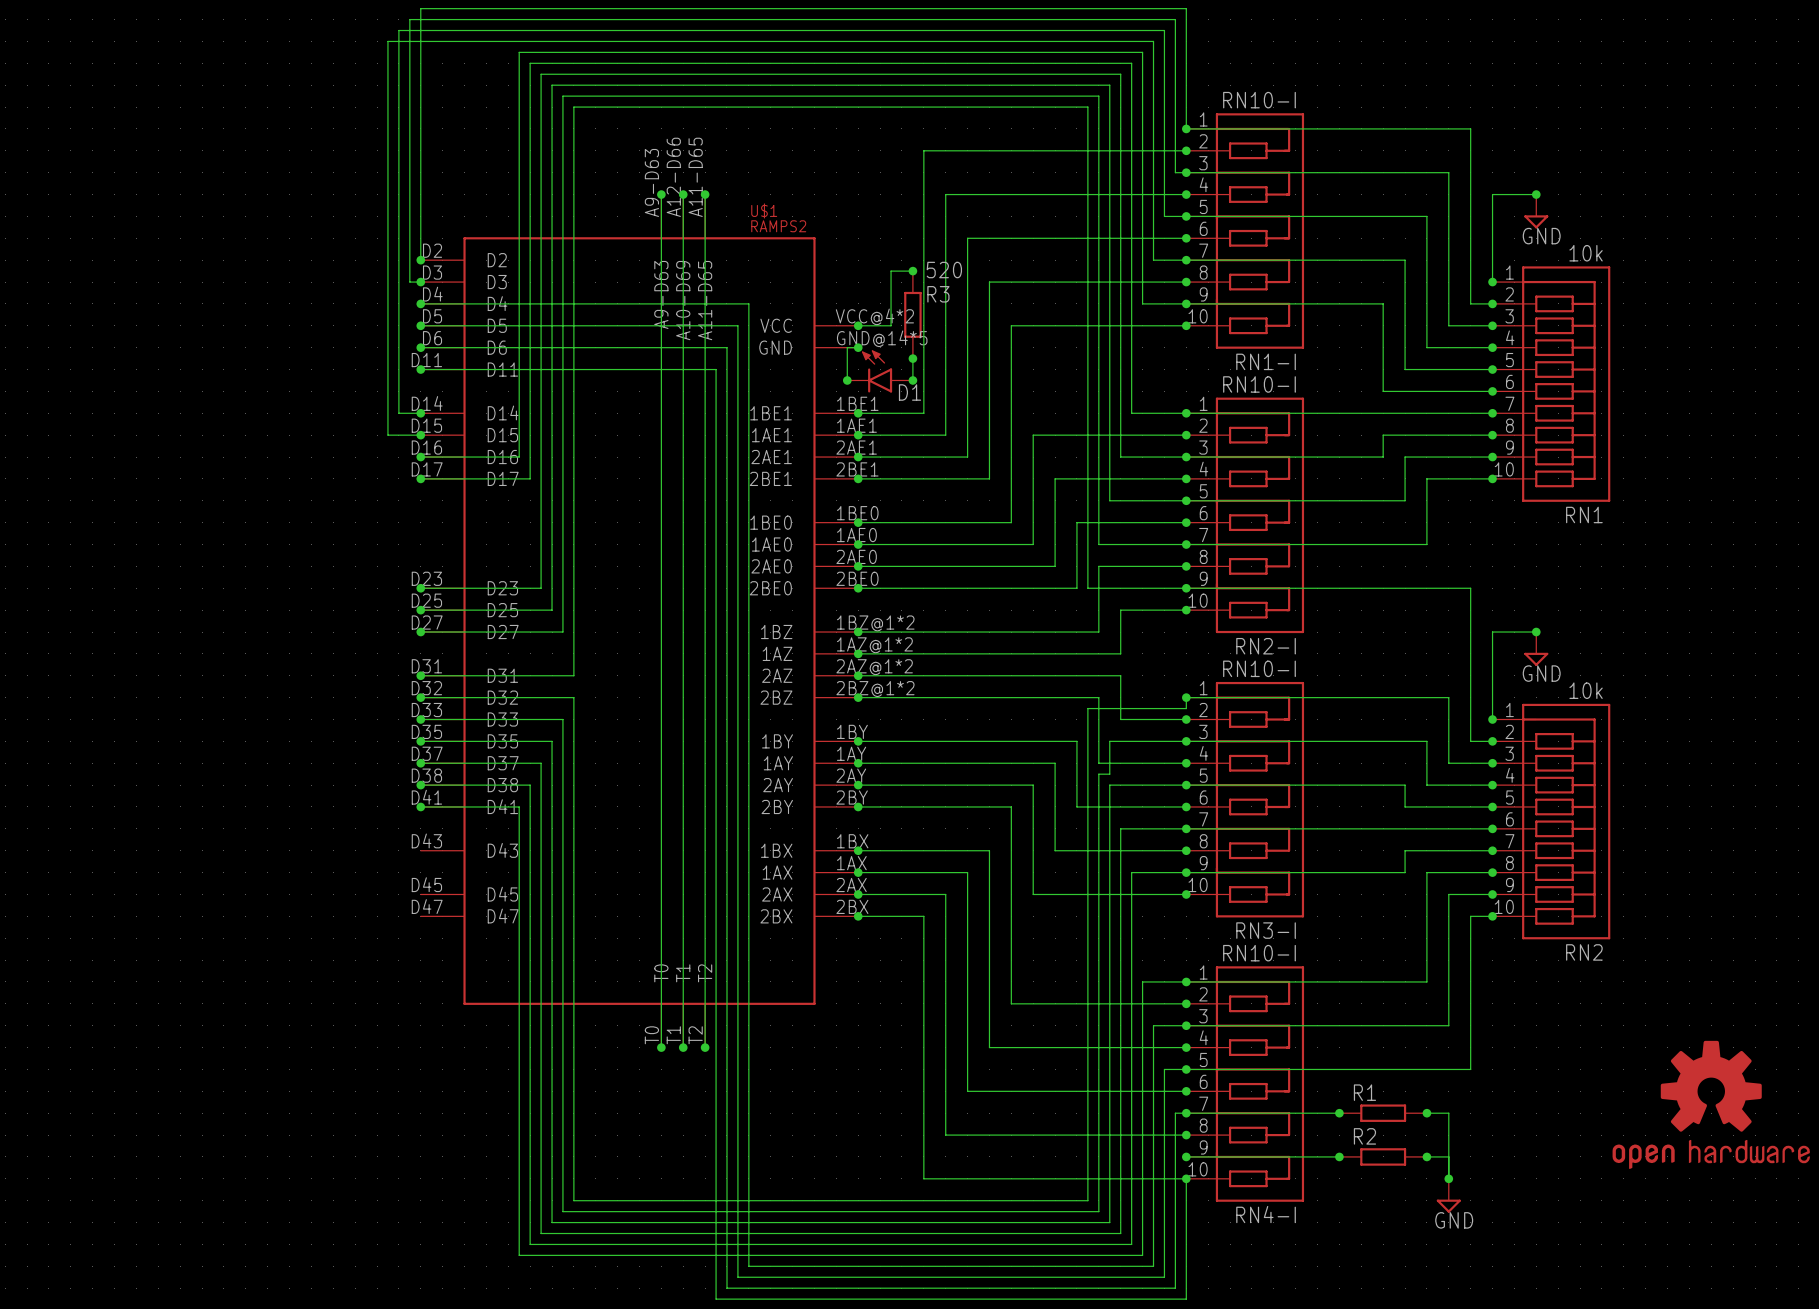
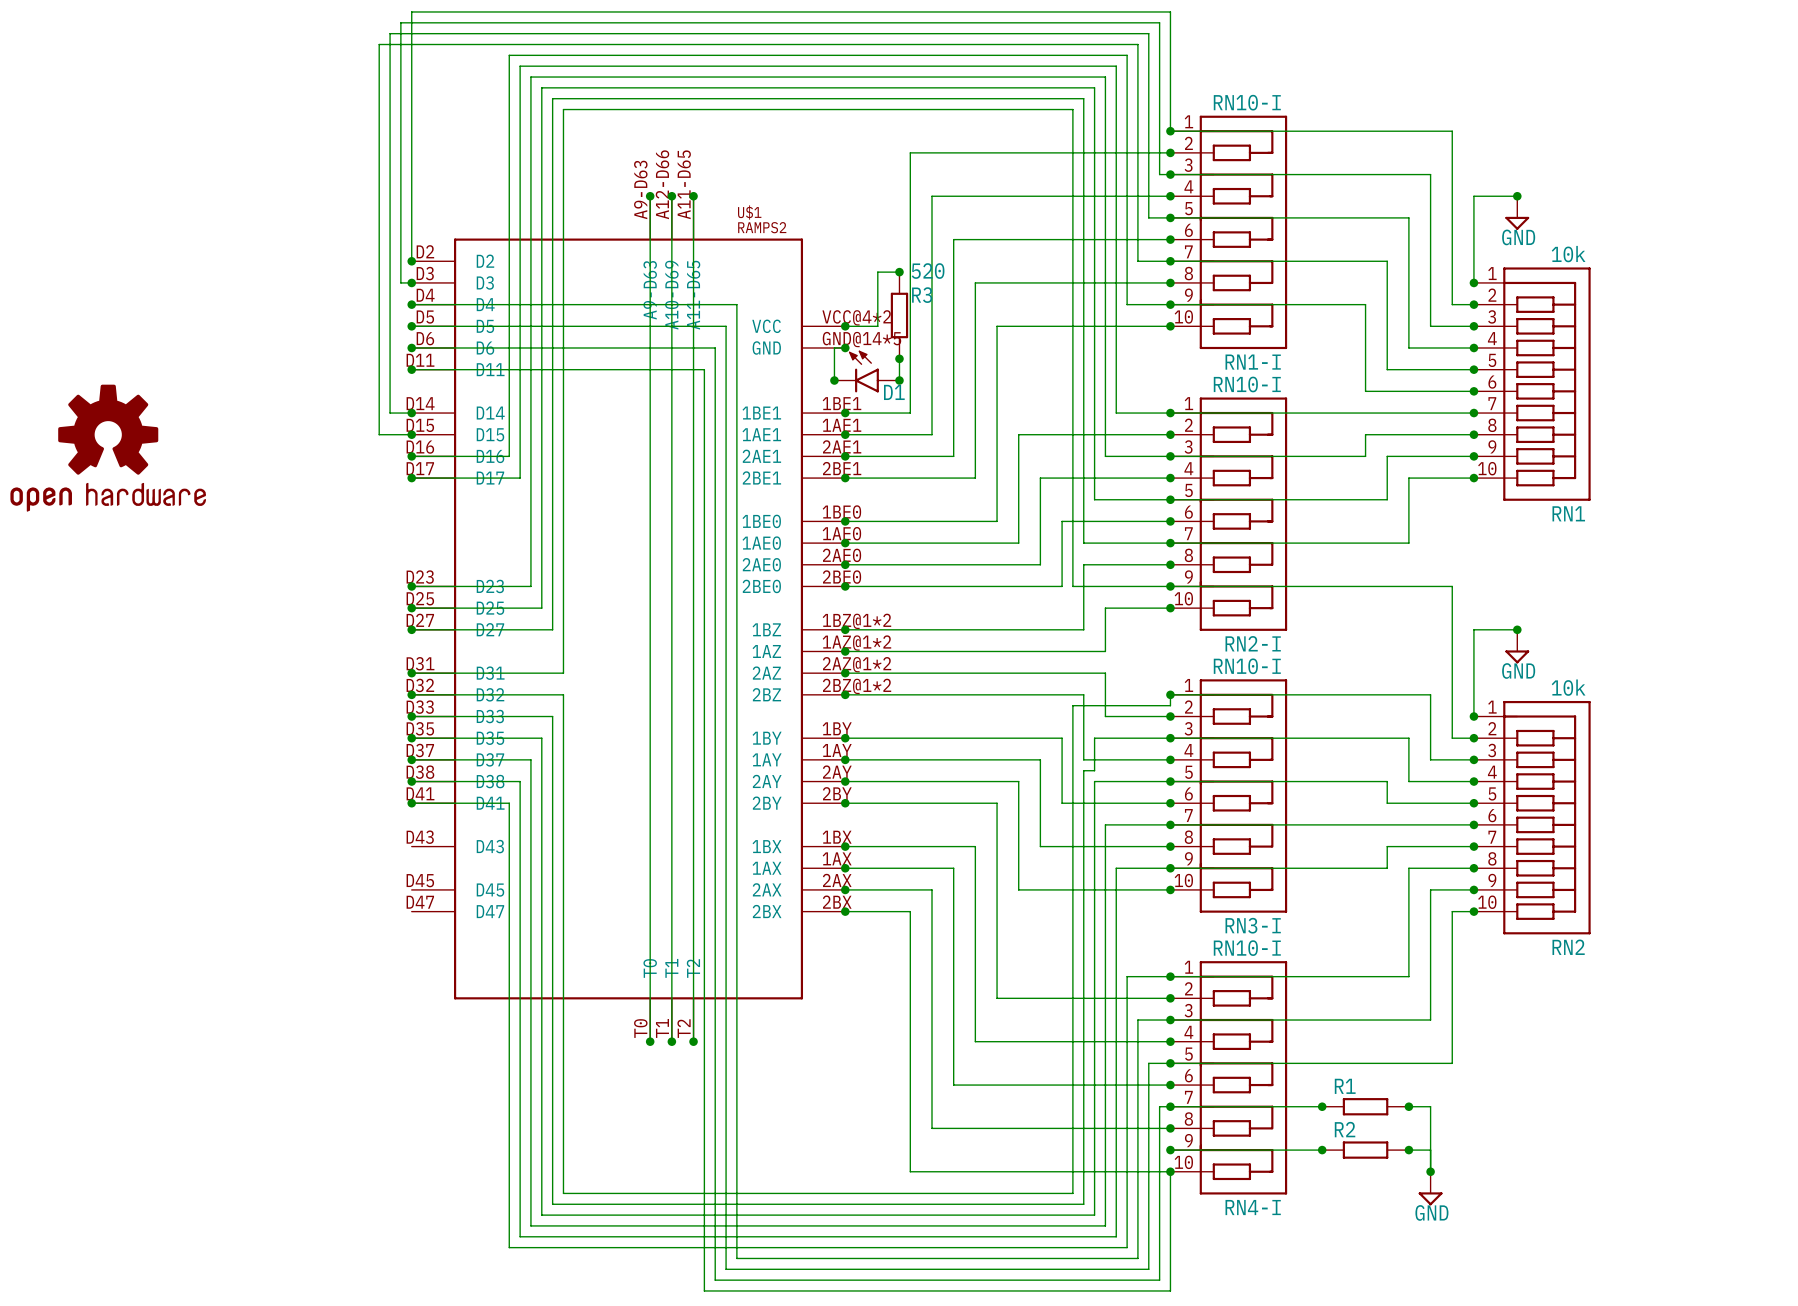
part: none -> (108, 448)
part: (1711, 1104) -> none

